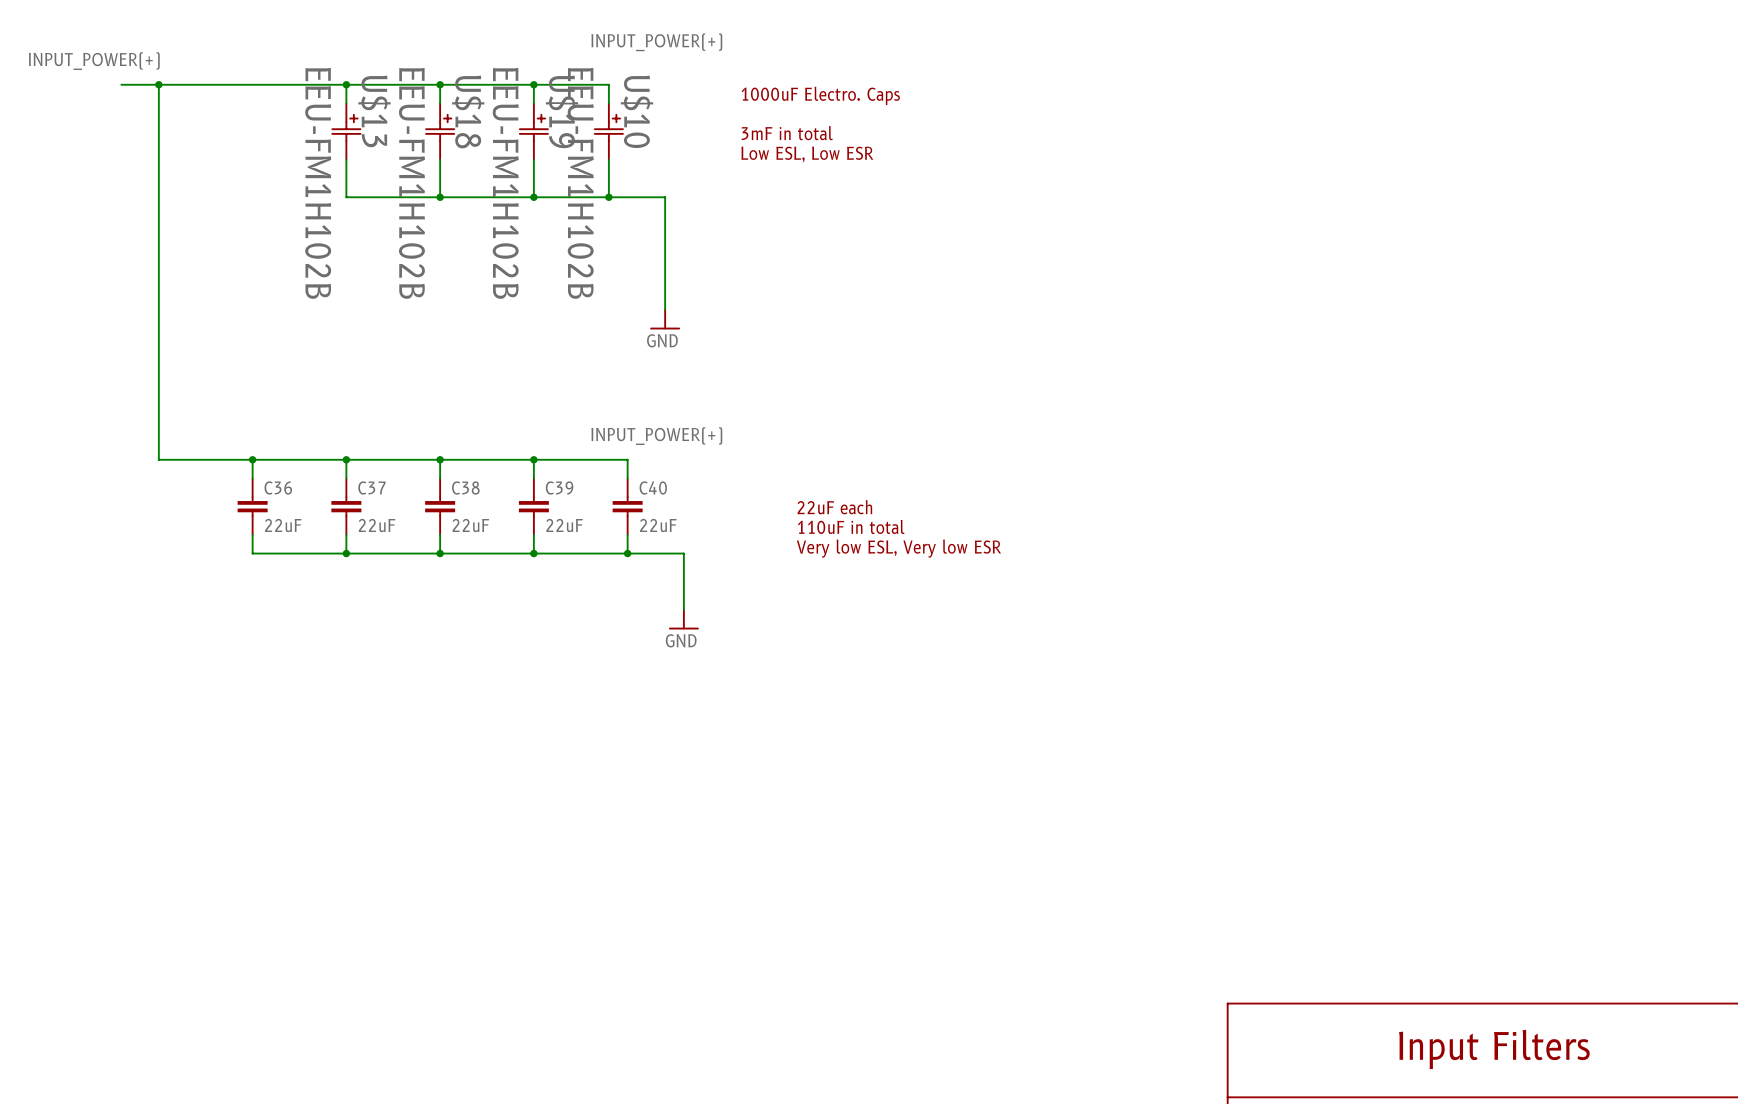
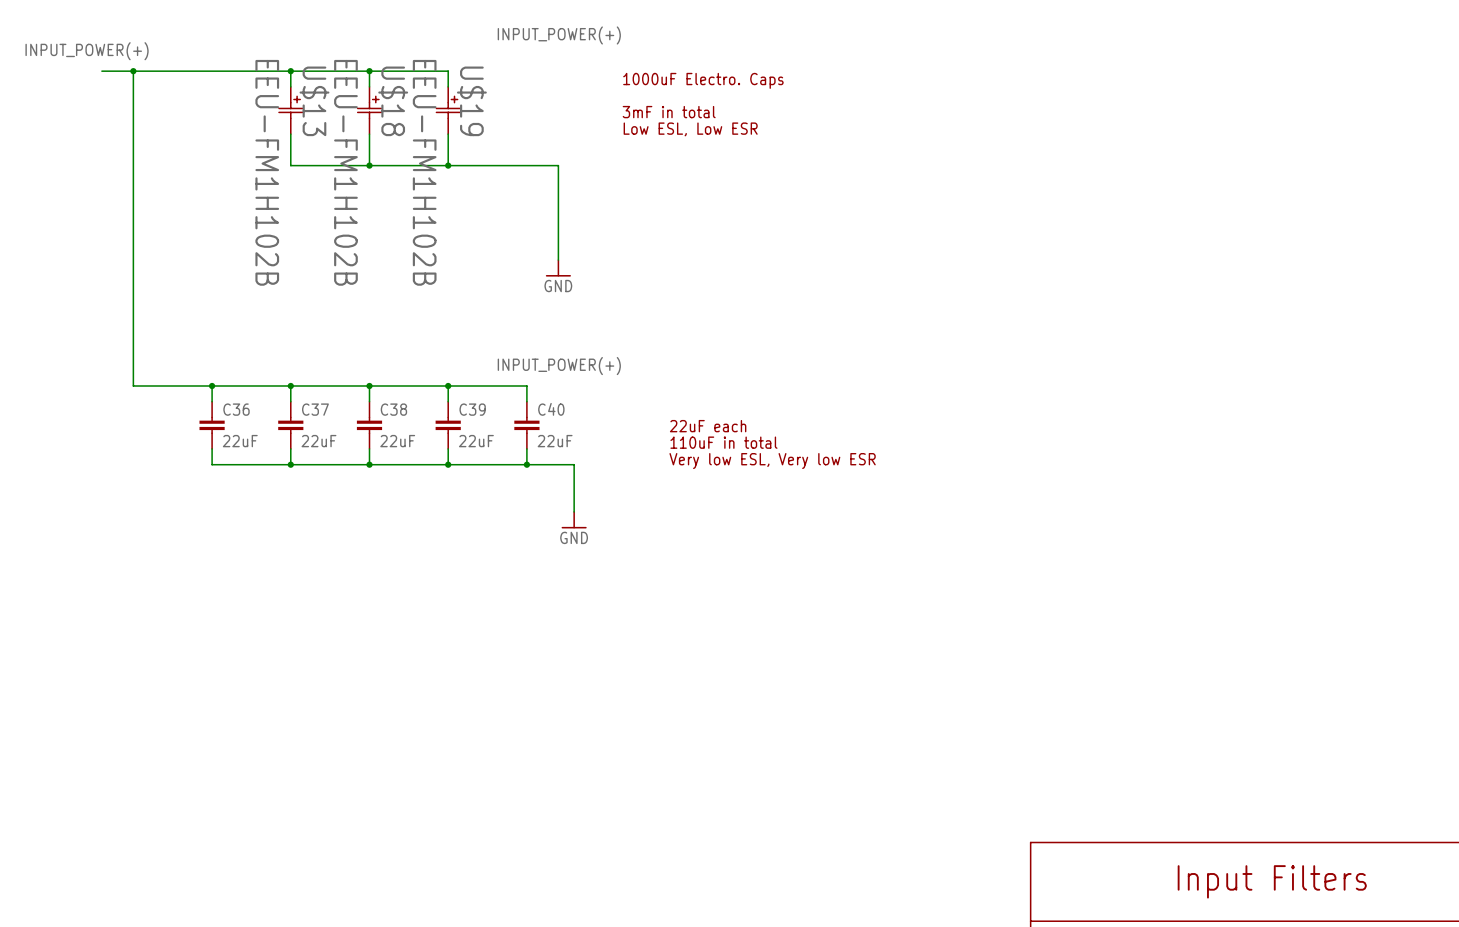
wire: (533, 84) (608, 84) (608, 103) -> none
junction: (533, 84) -> none
U$10: EEU-FM1H102B (608, 131) -> none
wire: (608, 159) (608, 197) -> none
junction: (608, 197) -> none

